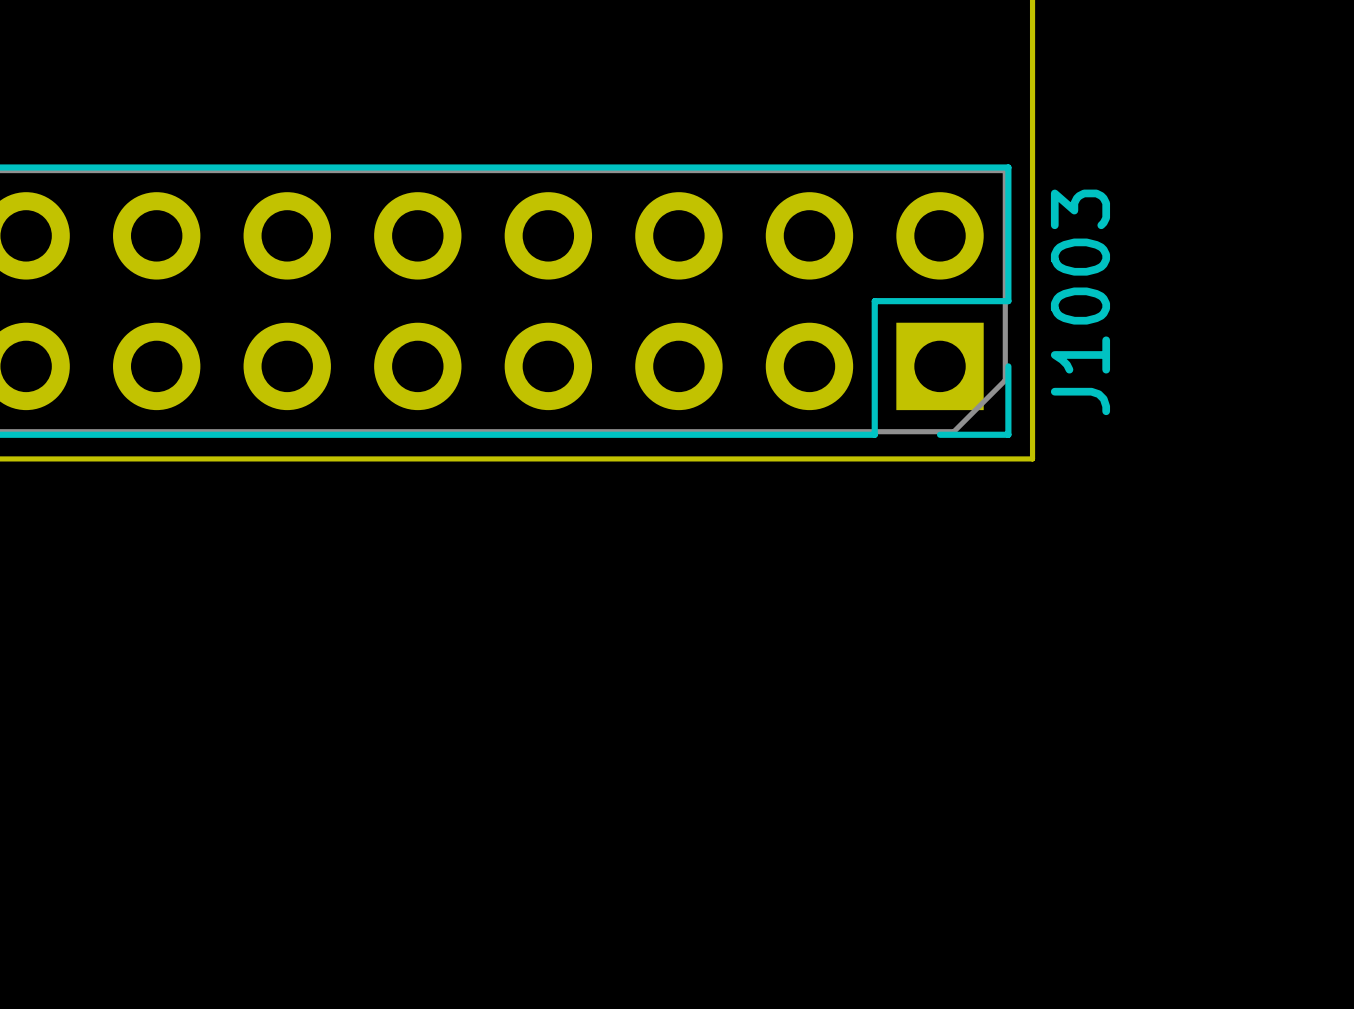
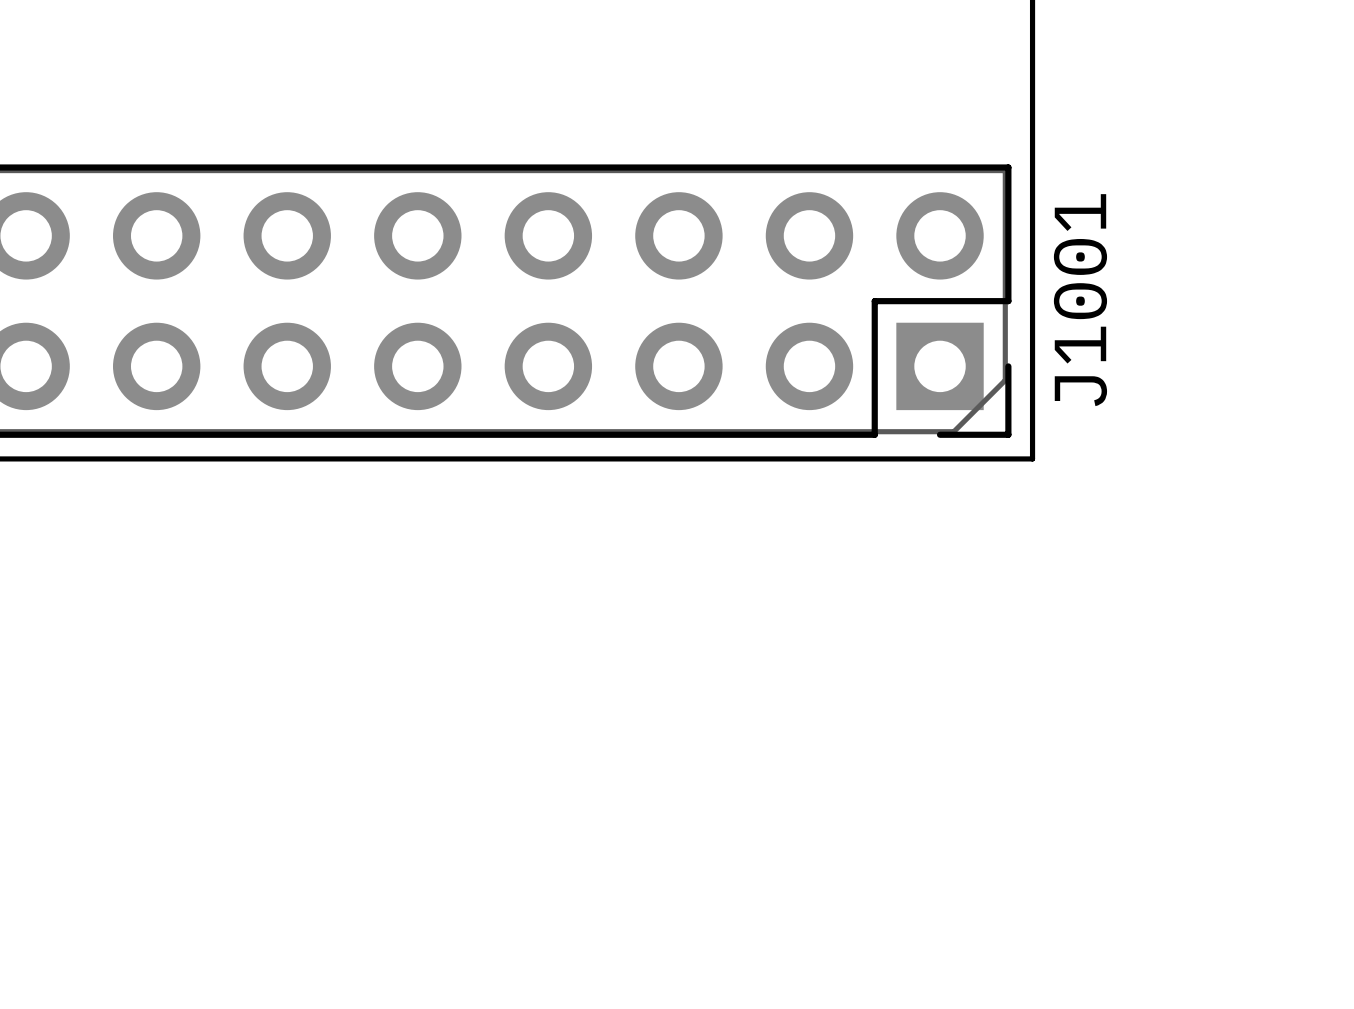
J1003 name: J1003 (1080, 302) -> J1001 (1080, 300)

